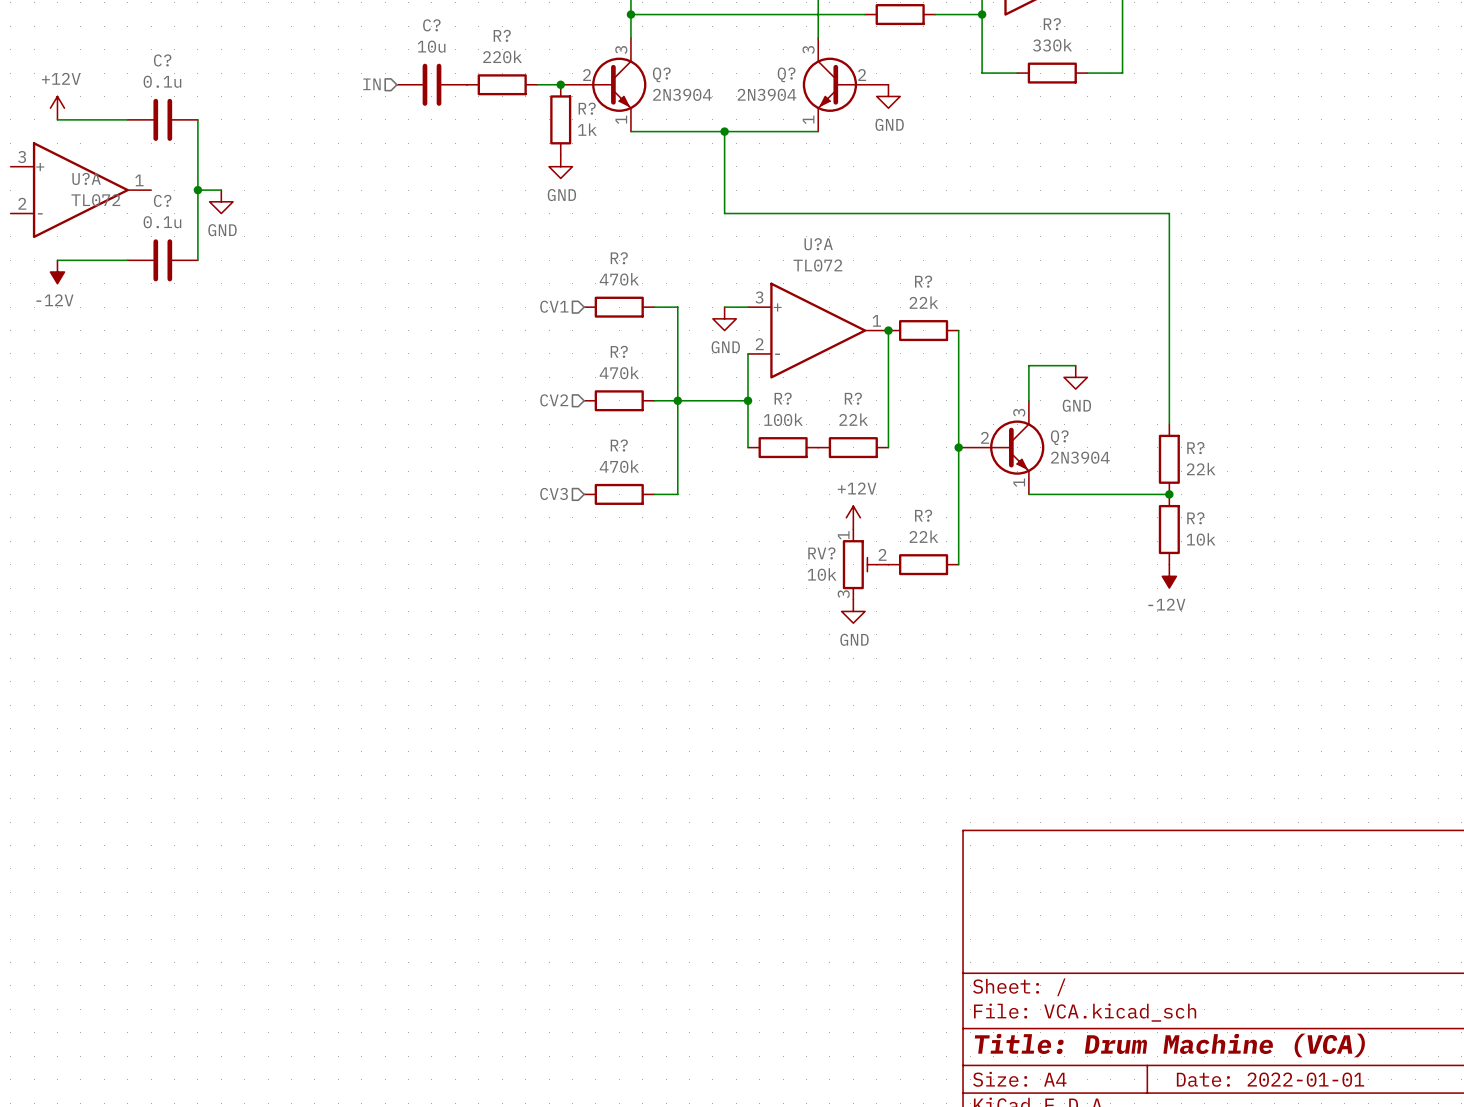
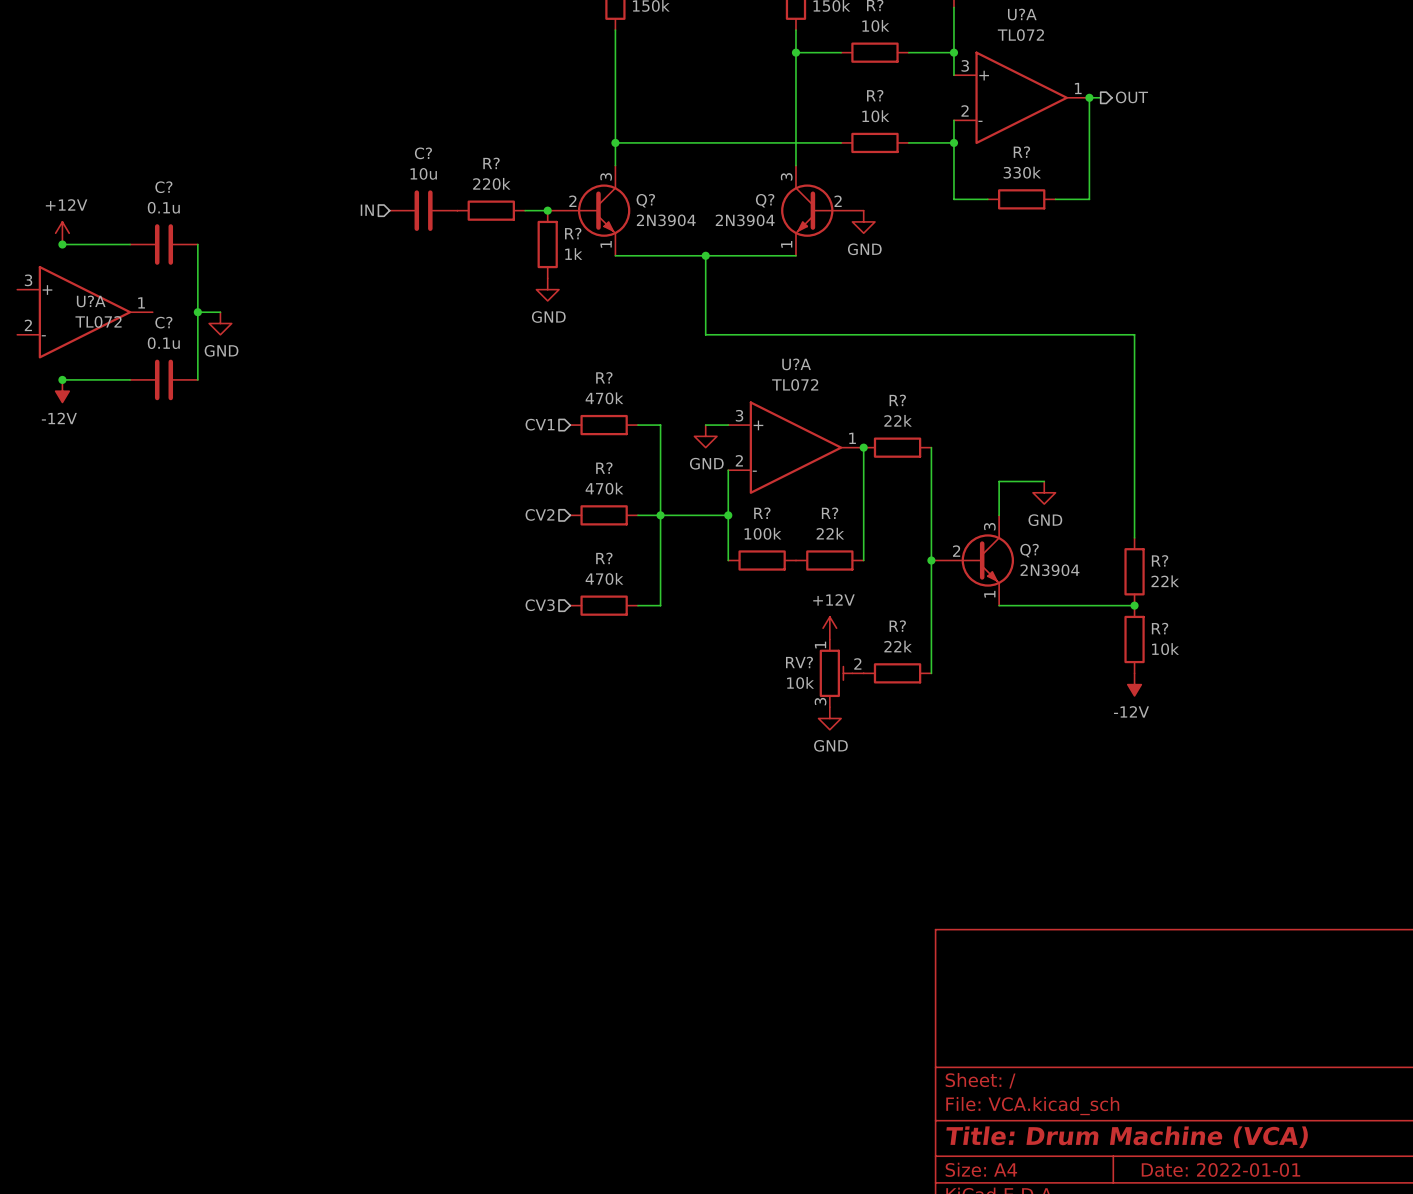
junction: none -> (62, 244)
junction: none -> (62, 379)

